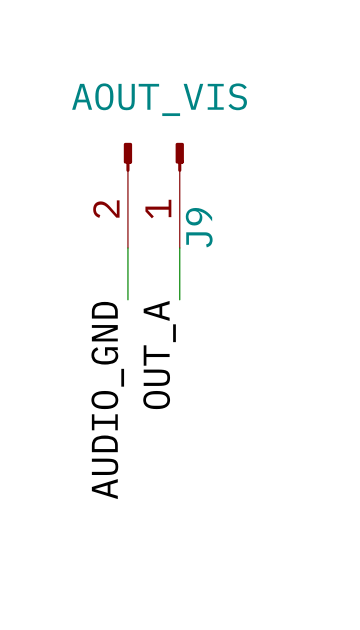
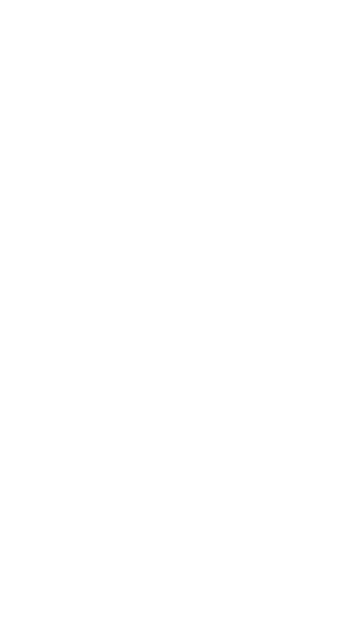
J9: AOUT_VIS (153, 195) -> none
wire: (127, 248) (127, 299) -> none
wire: (179, 248) (179, 299) -> none
label: OUT_A (159, 355) -> none
label: AUDIO_GND (107, 400) -> none

